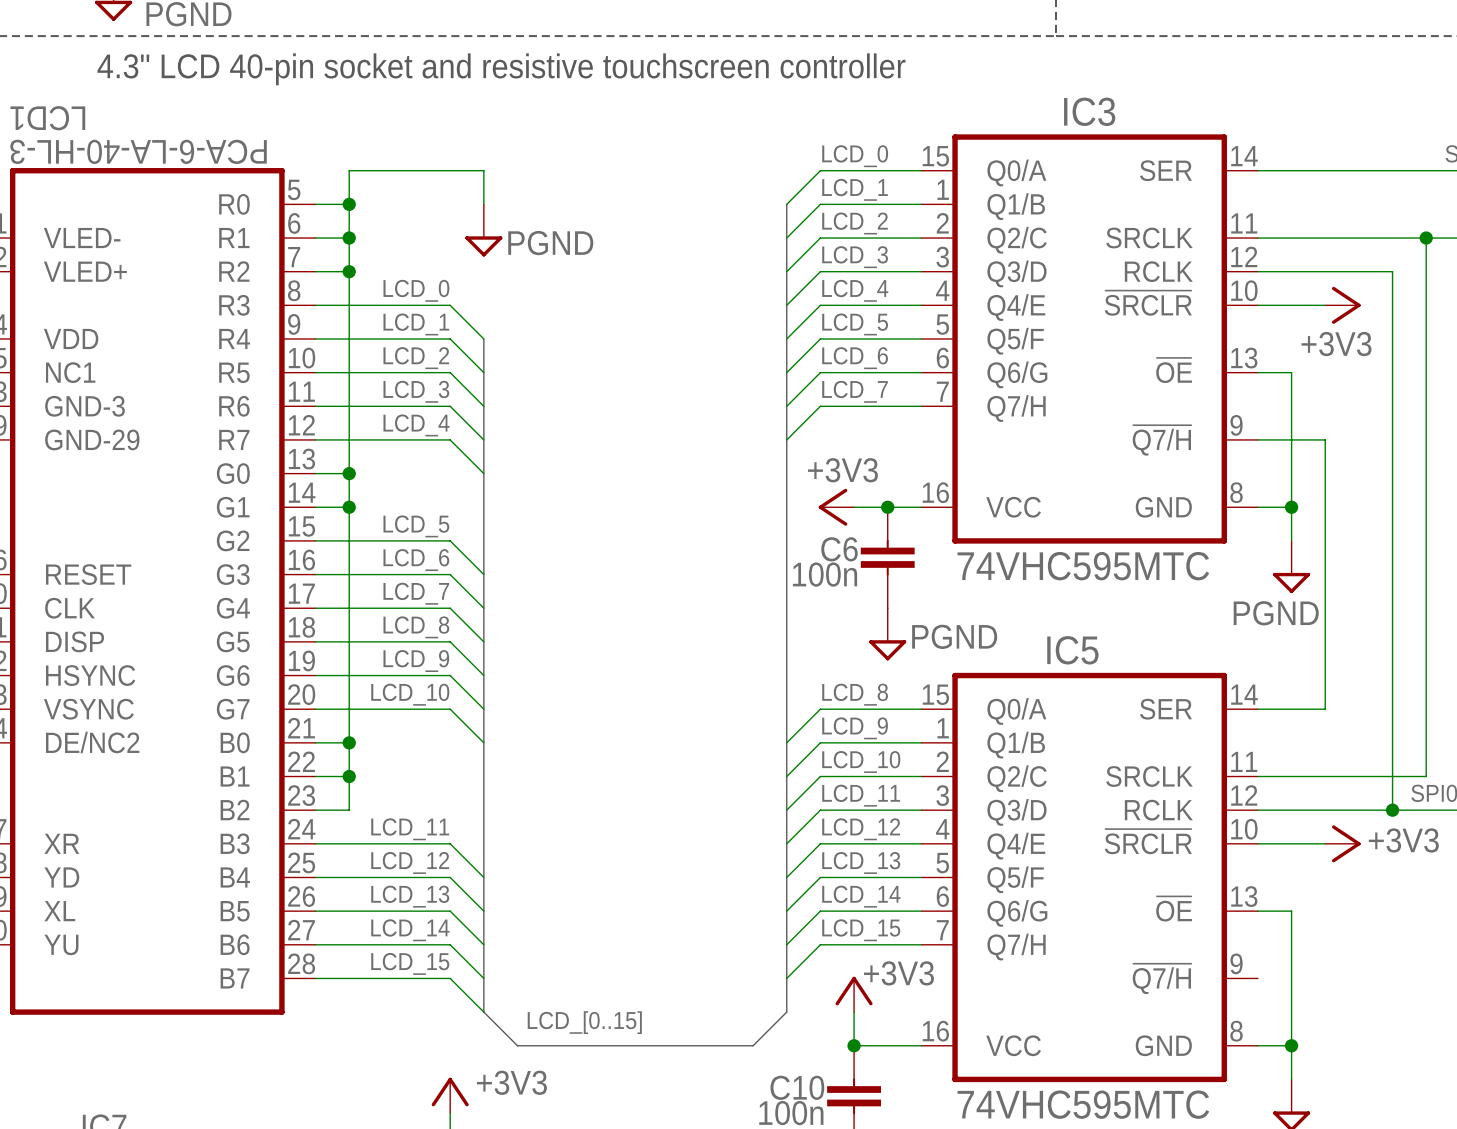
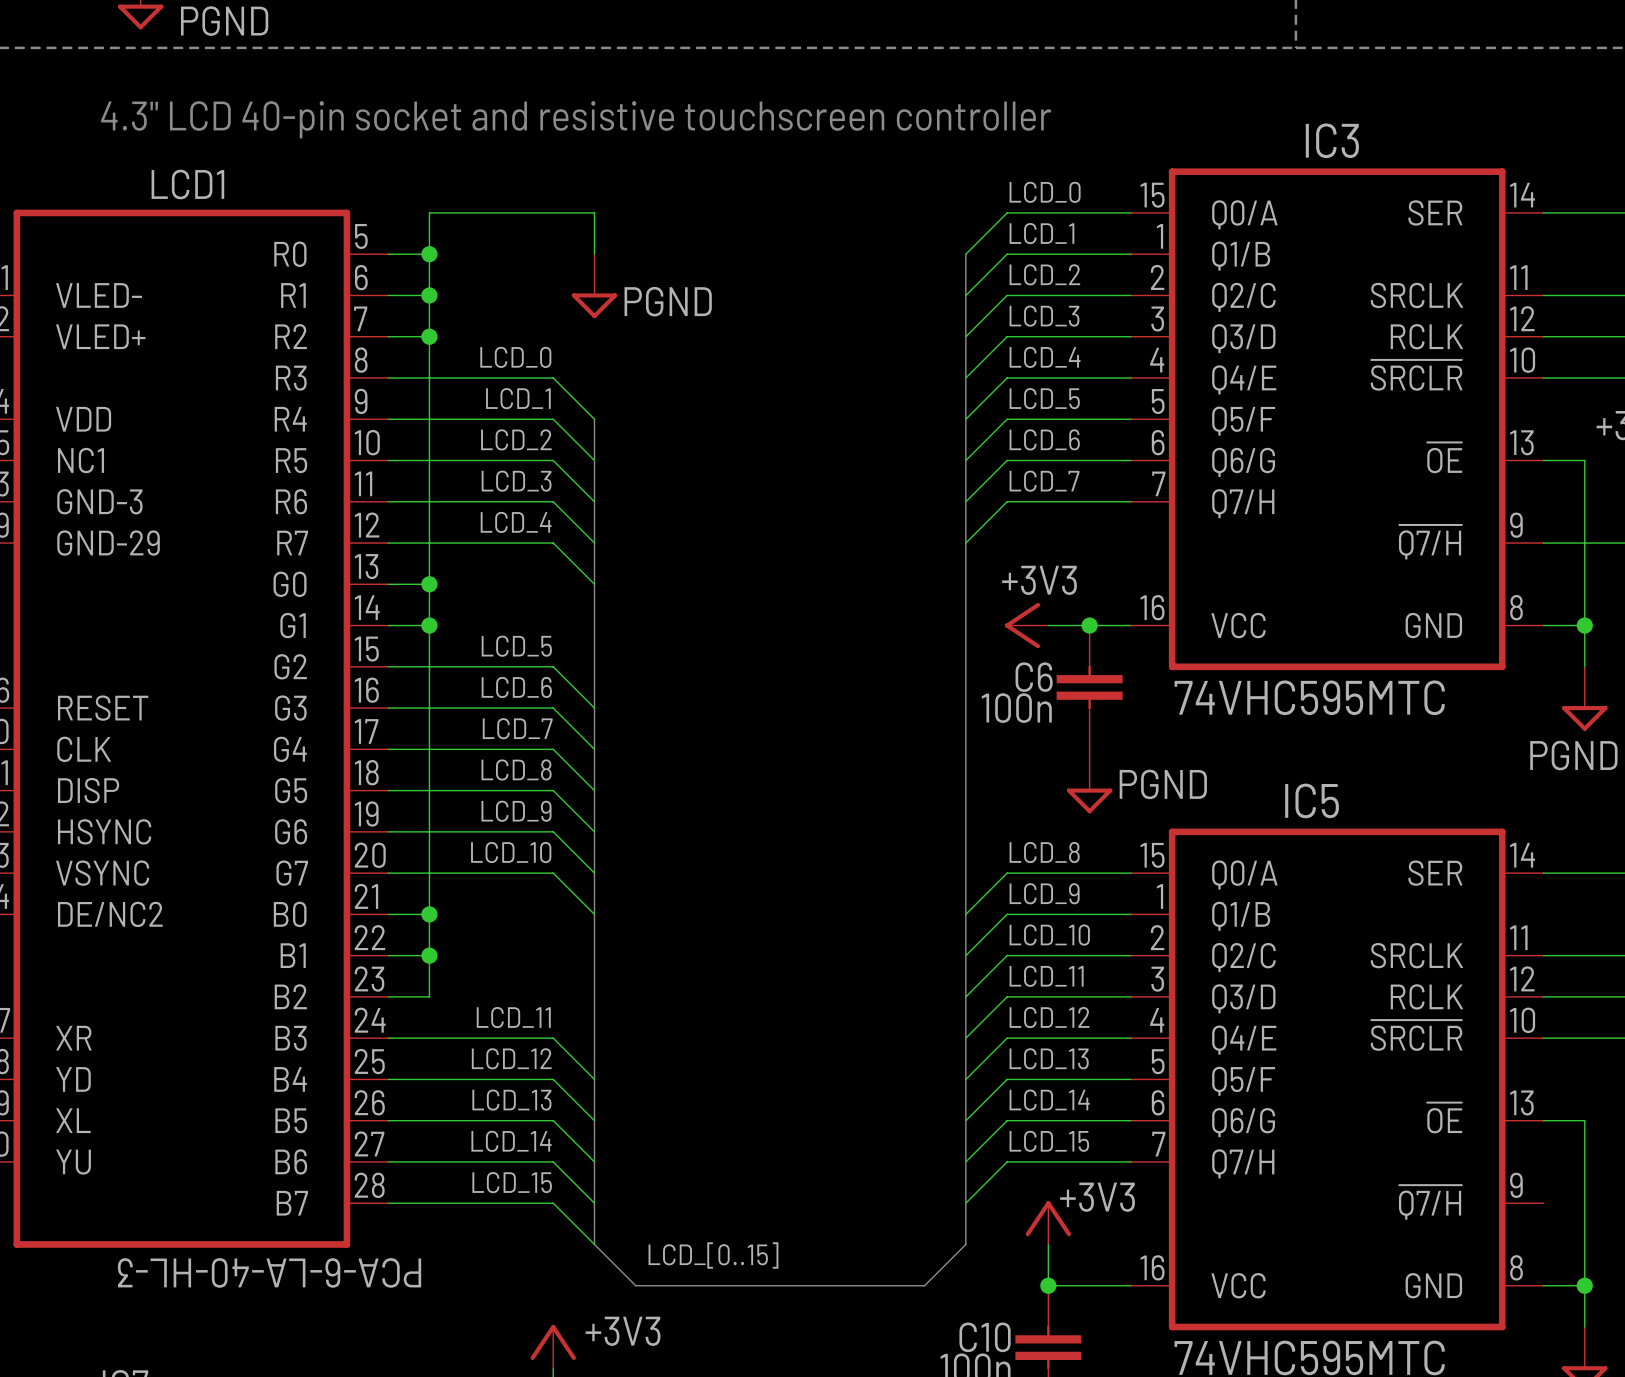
text position: 4.3" LCD 40-pin socket and resistive touchscreen controller (501, 69) -> 4.3" LCD 40-pin socket and resistive touchscreen controller (576, 119)
LCD1 name rotation: 0° (47, 118) -> 180° (187, 184)
LCD1 value position: PCA-6-LA-40-HL-3 (138, 151) -> PCA-6-LA-40-HL-3 (269, 1272)

